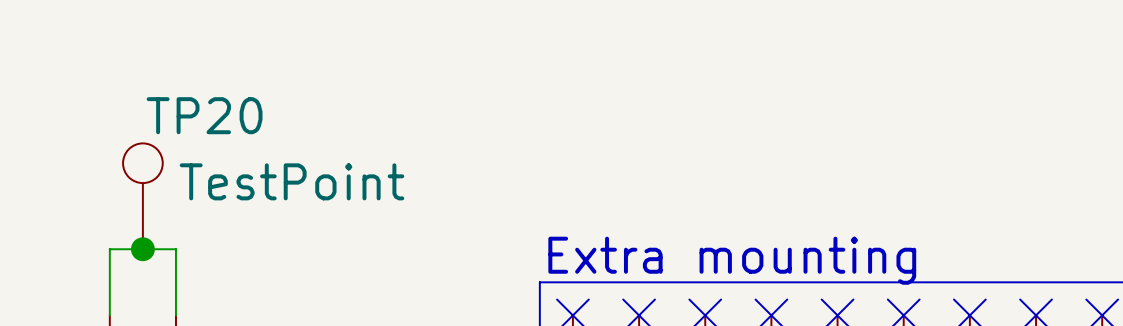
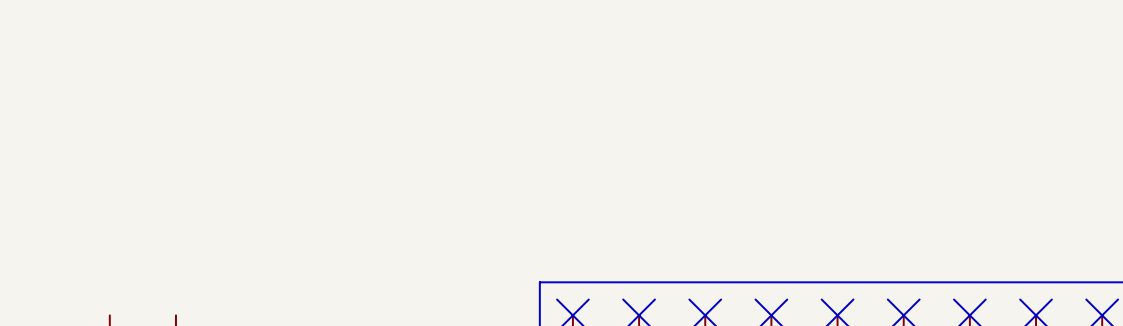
TP20: TestPoint (142, 196) -> none
junction: (142, 249) -> none
text: Extra mounting (732, 260) -> none
wire: (109, 315) (109, 249) (175, 249) (175, 315) -> none

